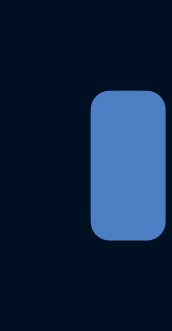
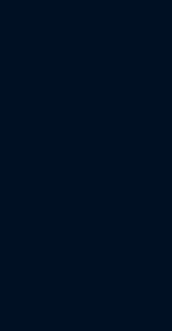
part: (128, 165) -> none

